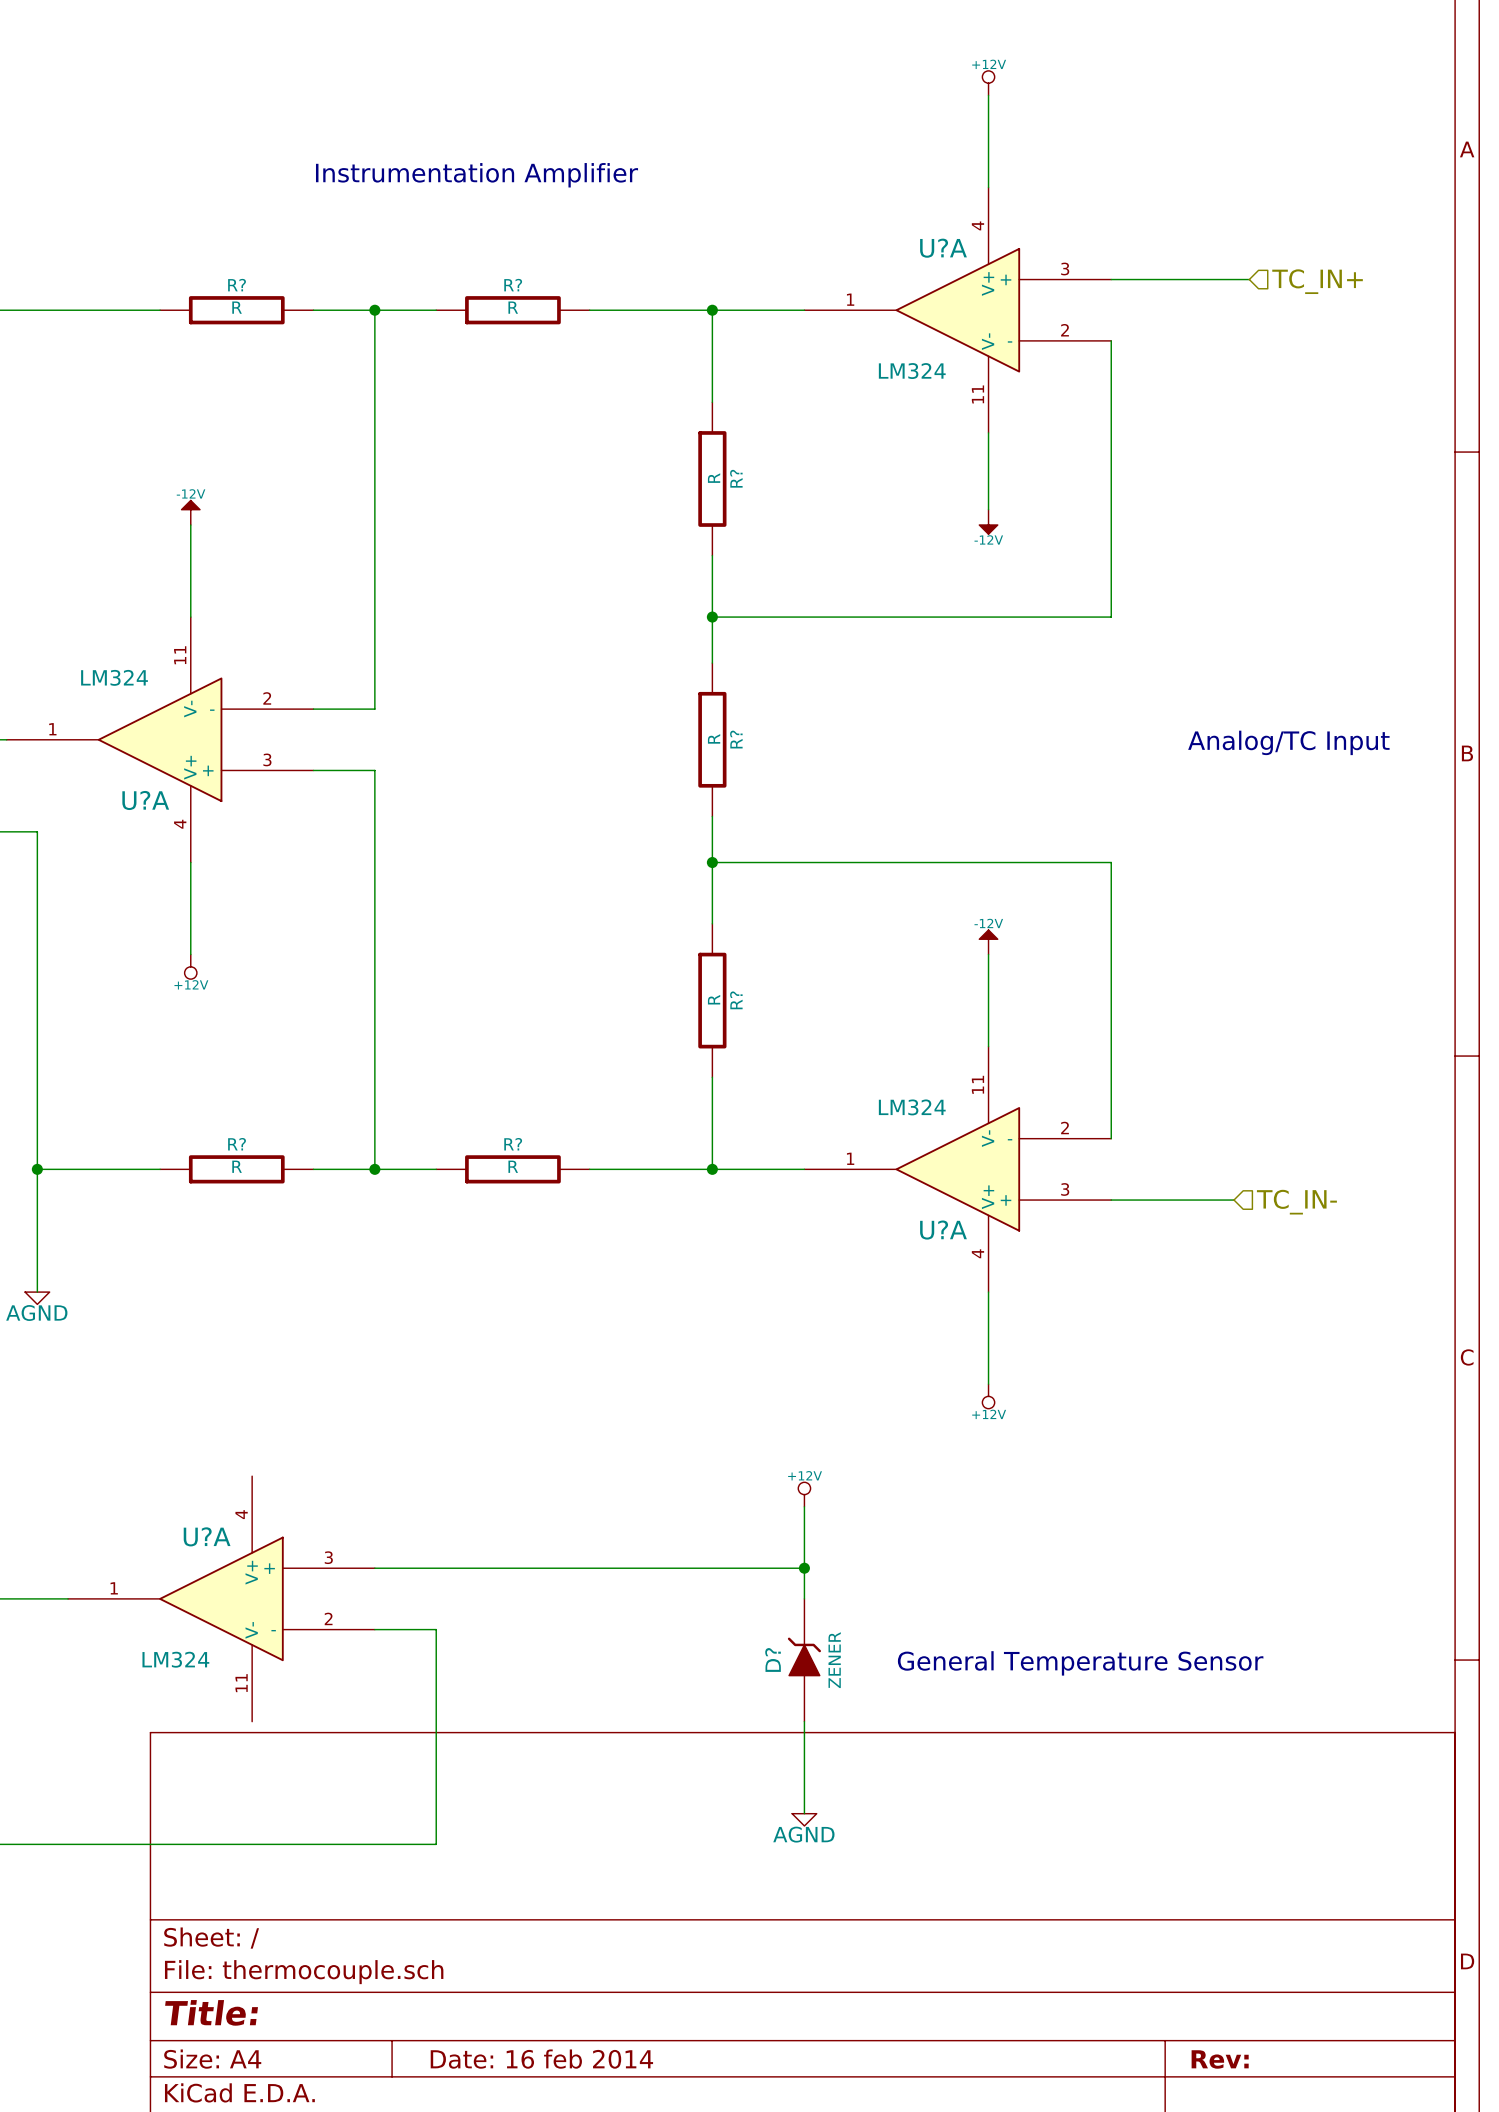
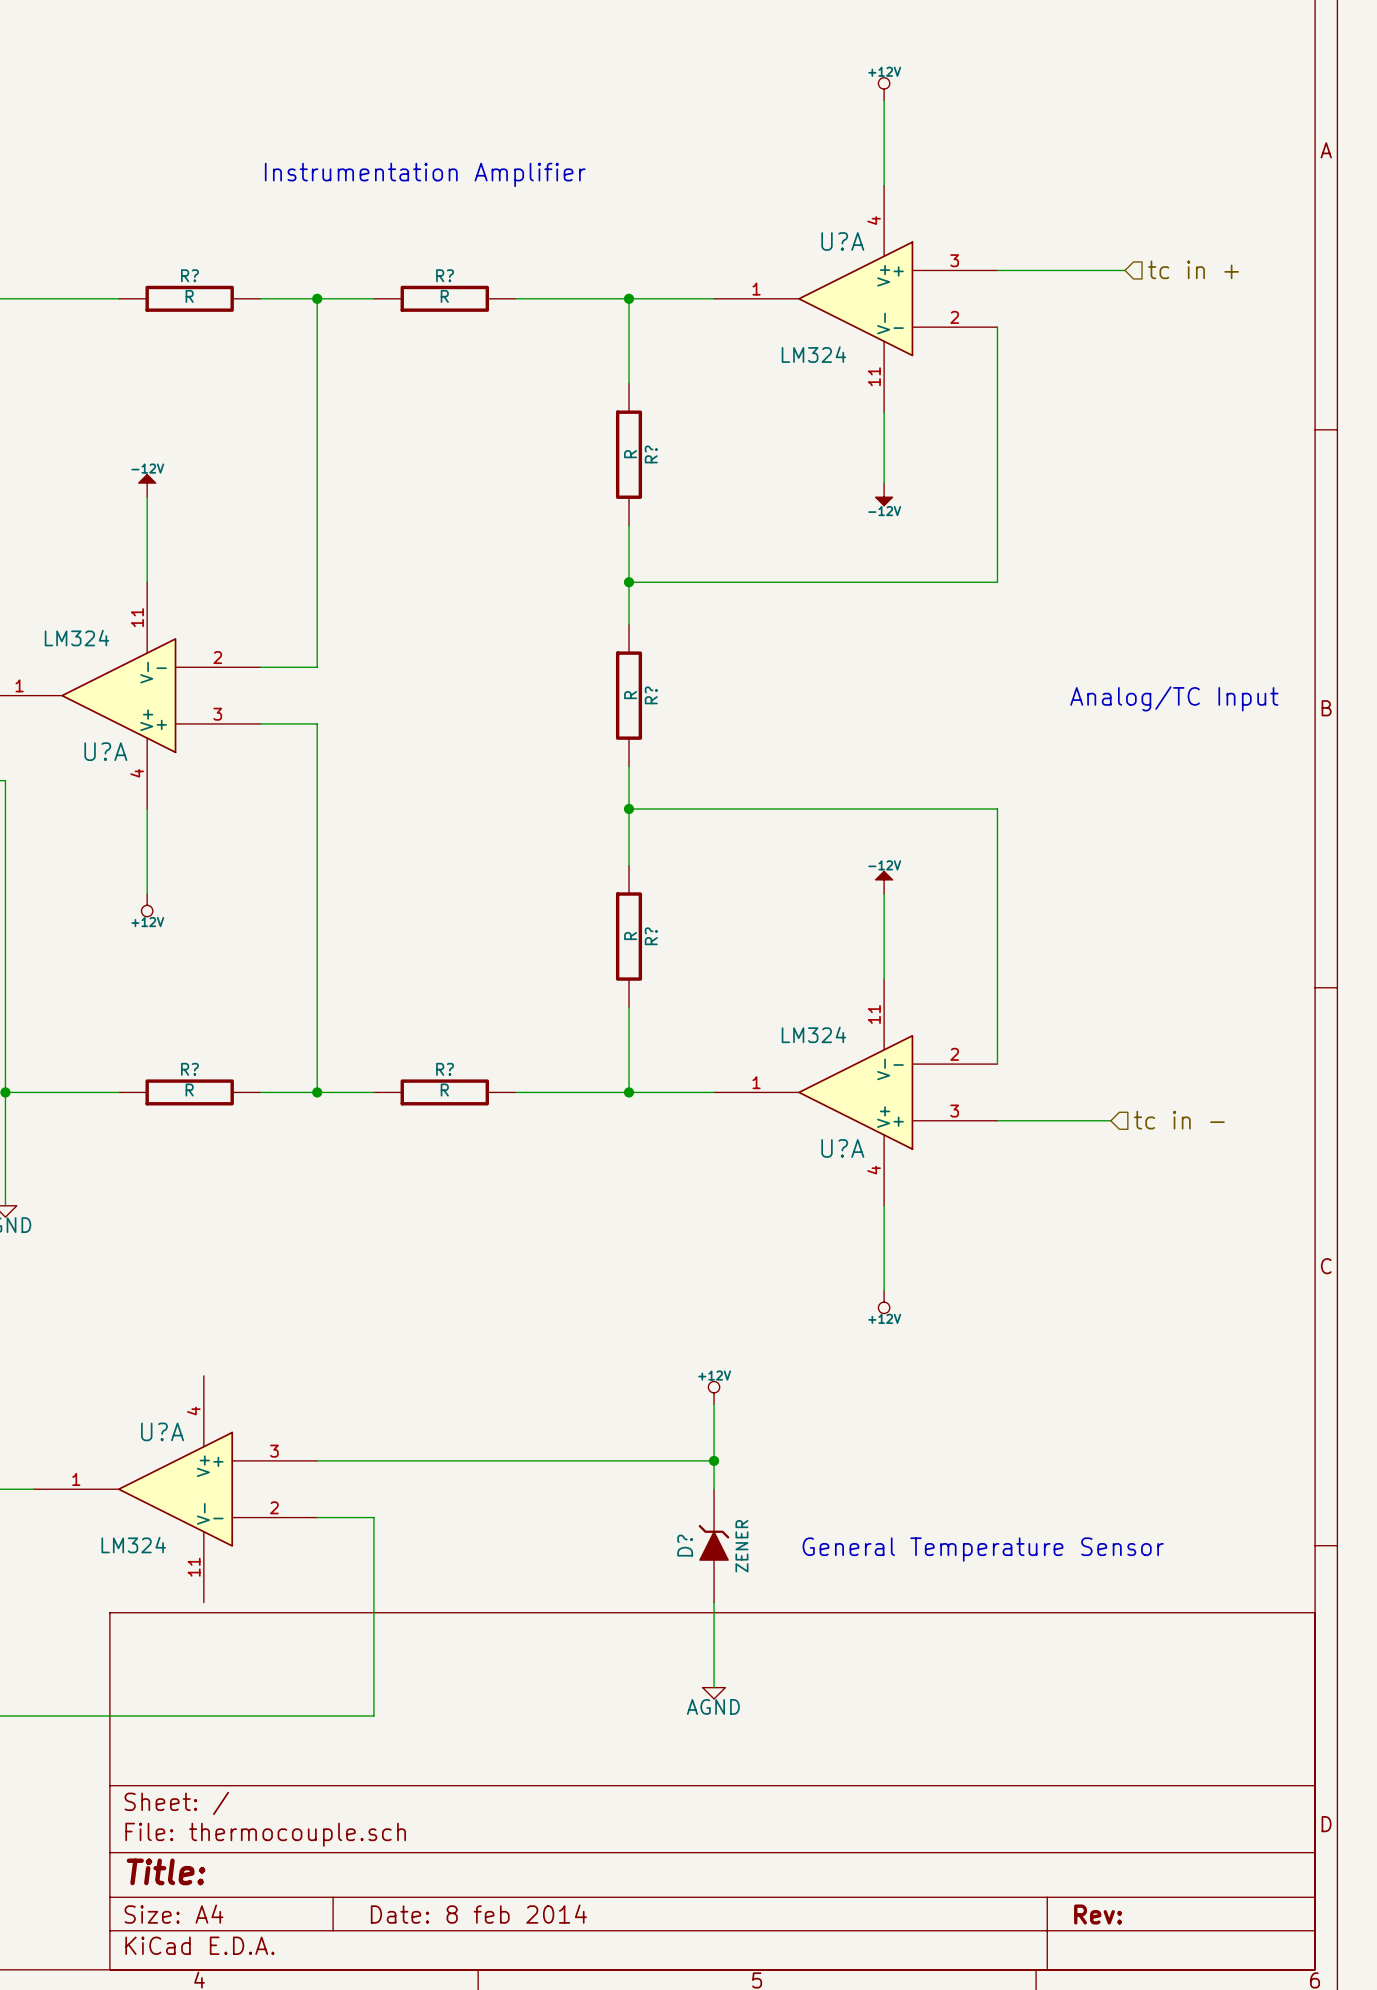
hierarchical label: TC_IN+ (1317, 281) -> tc in + (1193, 269)
hierarchical label: TC_IN- (1296, 1202) -> tc in - (1179, 1120)
title block: Date: 16 feb 2014 (541, 2059) -> Date: 8 feb 2014 (478, 1914)

